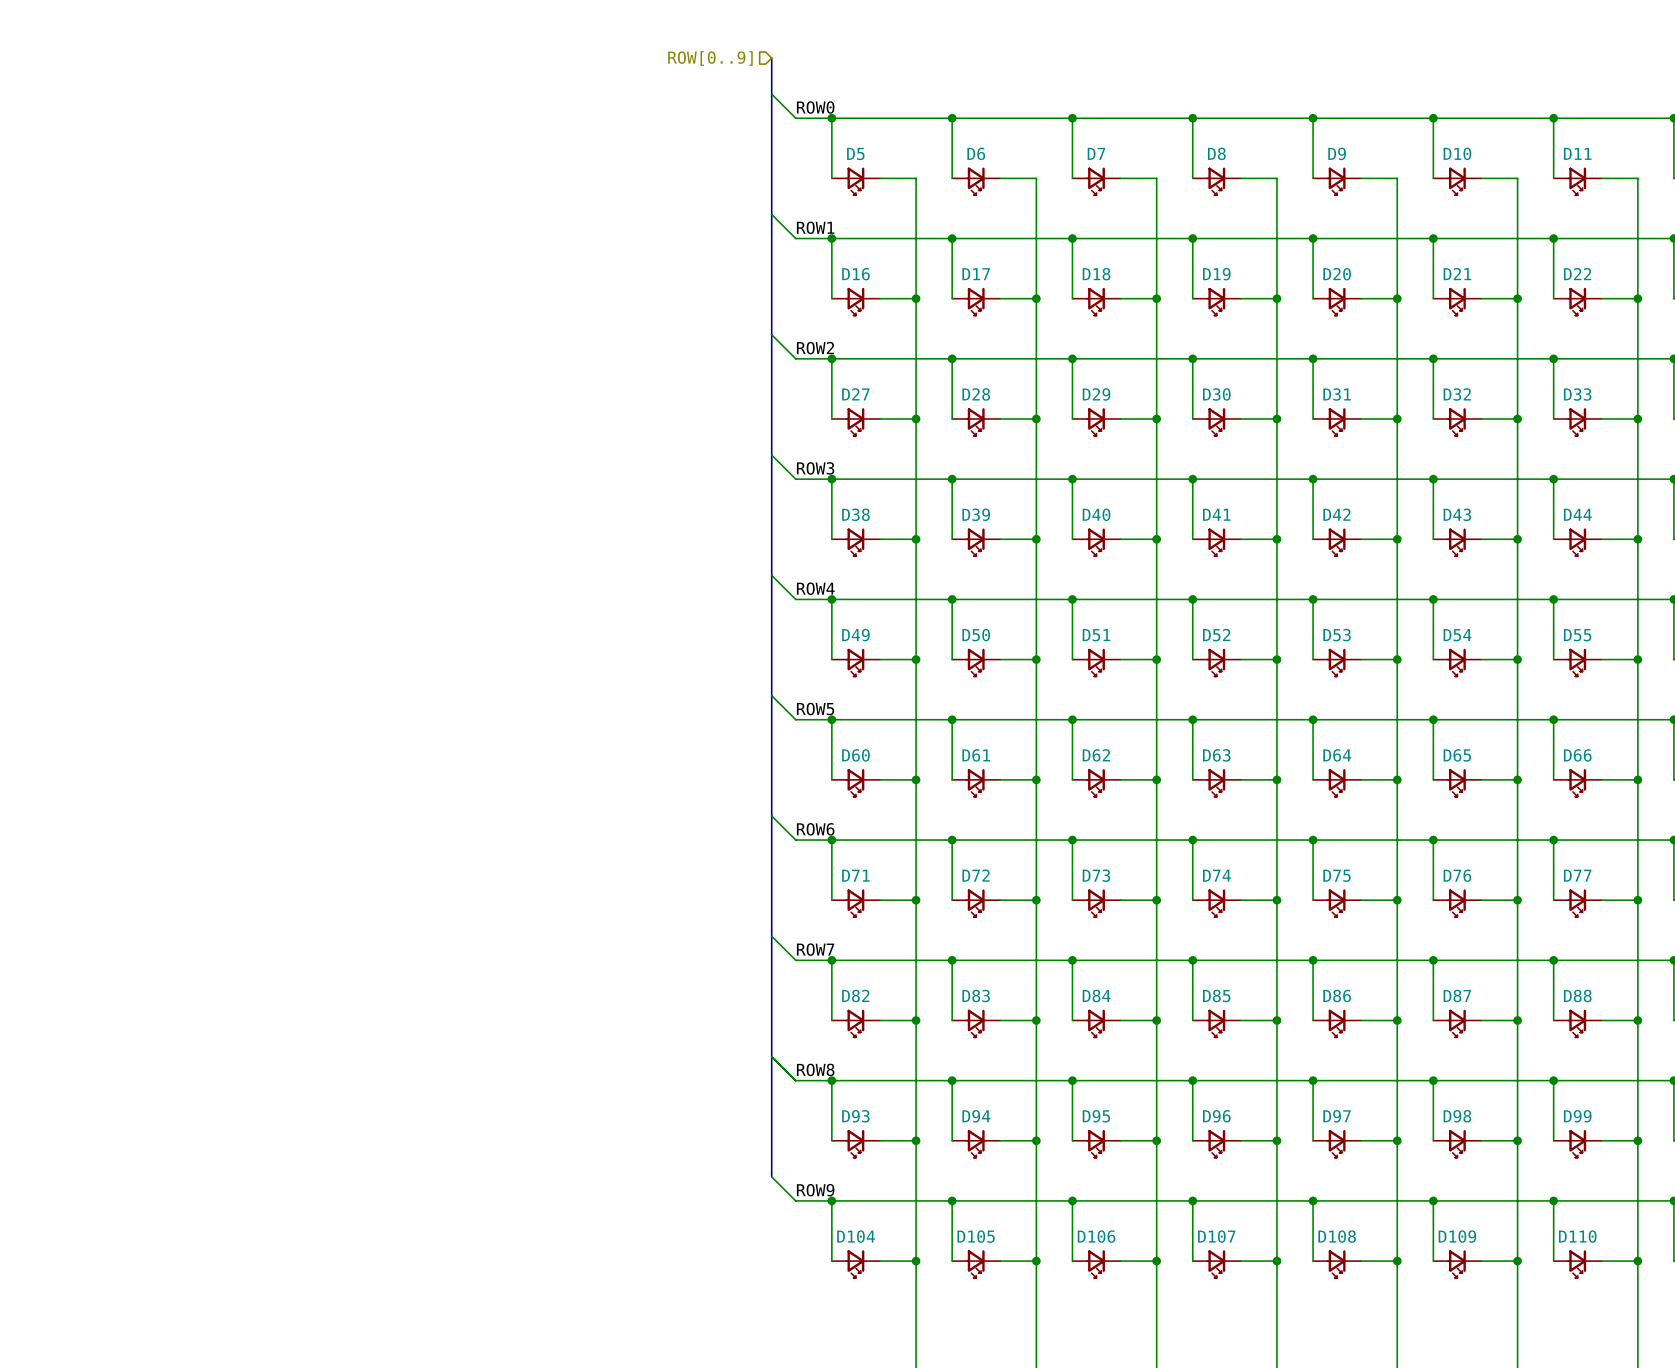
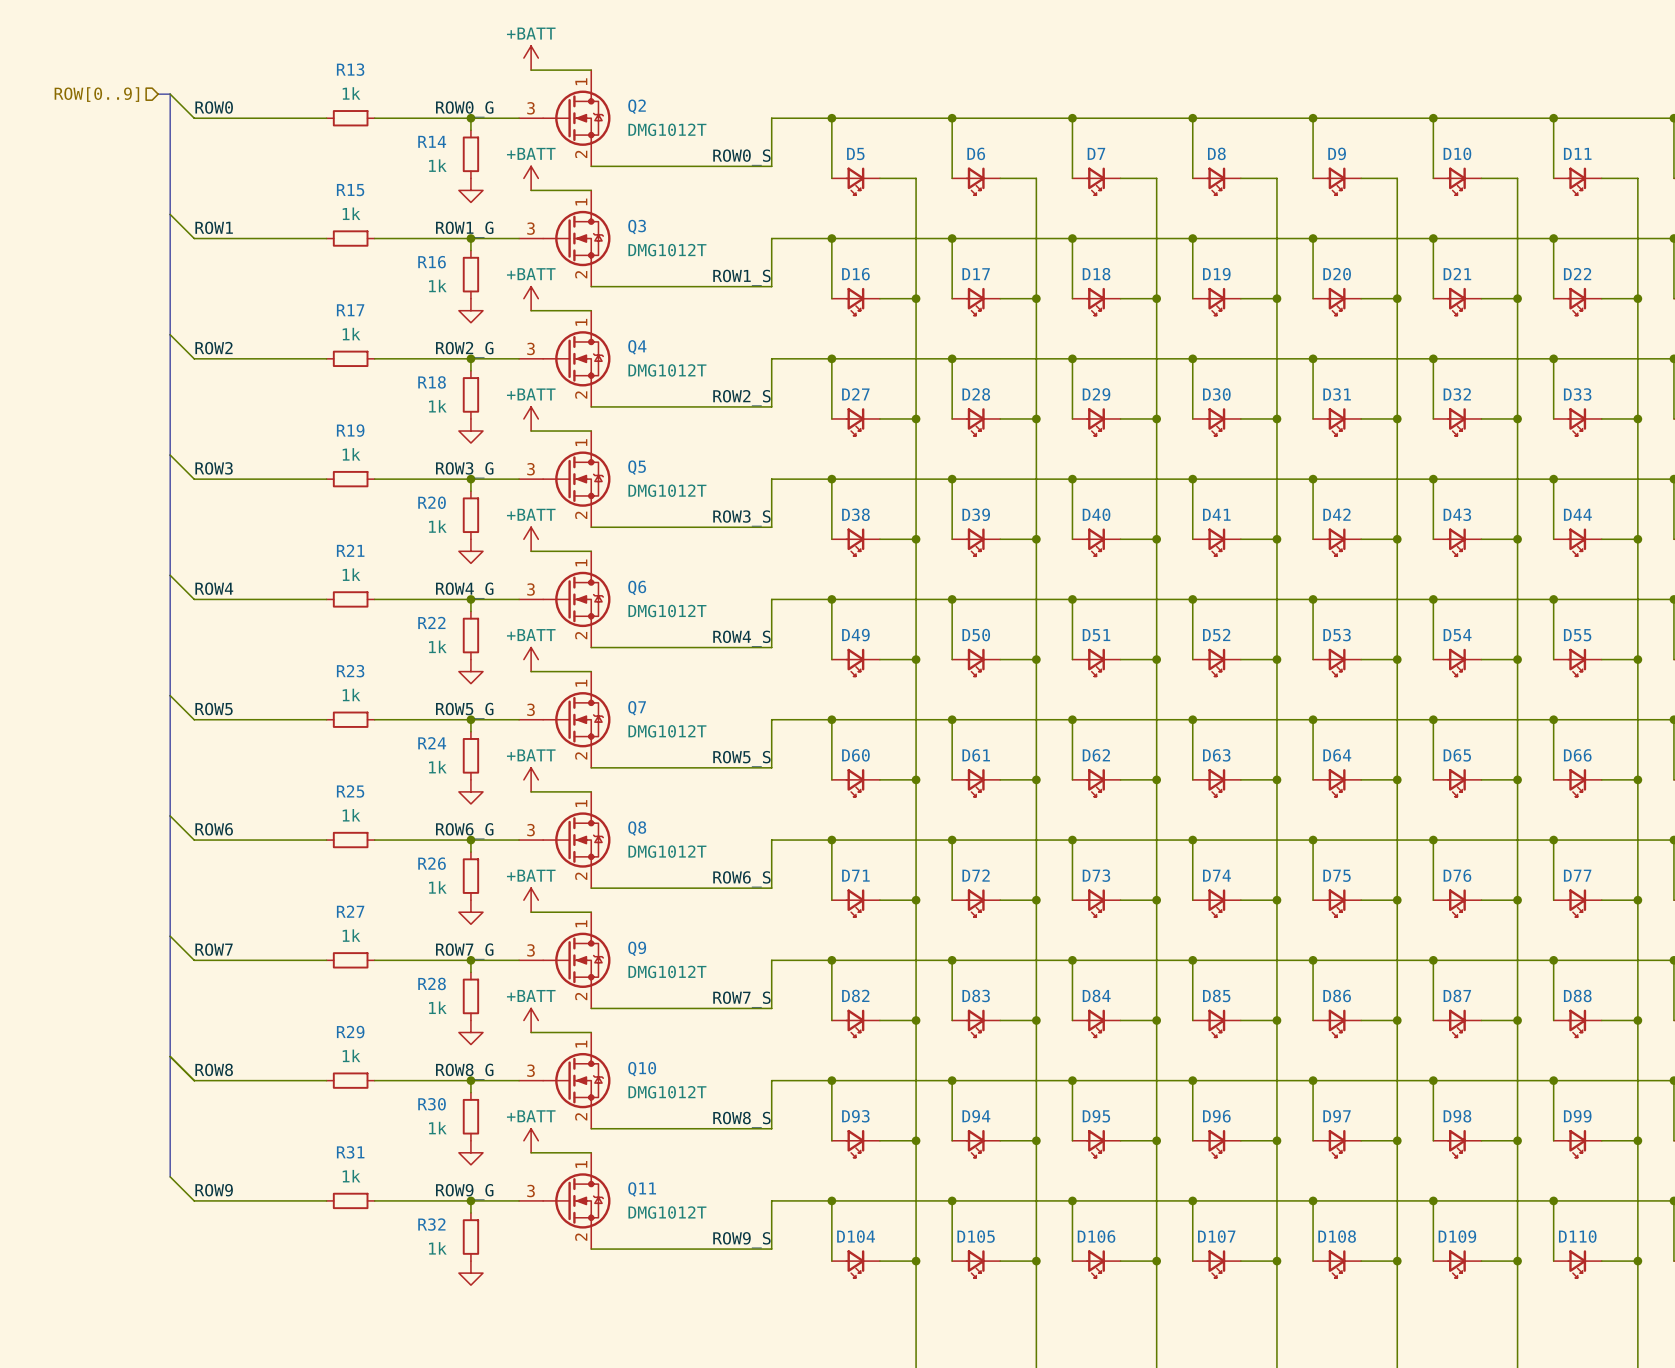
power symbol: none -> +BATT (531, 58)
hierarchical label: ROW[0..9] (710, 58) -> none
bus: (771, 58) (771, 1176) -> none
wire: none -> (531, 70) (591, 70)
hierarchical label: none -> ROW[0..9] (96, 94)
bus: none -> (158, 94) (170, 94) (170, 1176)
wire: none -> (170, 94) (194, 118) (326, 118)
wire: (771, 94) (795, 118) -> (591, 166) (771, 166) (771, 118) (795, 118)
label: none -> ROW0 (214, 107)
label: ROW0 (815, 107) -> none
label: none -> ROW0_G (464, 109)
R13: none -> 1k (350, 118)
wire: none -> (374, 118) (519, 118)
wire: none -> (470, 118) (470, 130)
junction: none -> (470, 118)
Q2: none -> DMG1012T (564, 118)
R14: none -> 1k (470, 154)
label: none -> ROW0_S (741, 157)
power symbol: none -> +BATT (531, 178)
power symbol: none -> (470, 190)
wire: none -> (531, 190) (591, 190)
wire: none -> (170, 214) (194, 238) (326, 238)
wire: (771, 214) (795, 238) -> (591, 286) (771, 286) (771, 238) (795, 238)
label: none -> ROW1 (214, 227)
label: ROW1 (815, 227) -> none
label: none -> ROW1_G (464, 229)
R15: none -> 1k (350, 238)
wire: none -> (374, 238) (519, 238)
wire: none -> (470, 238) (470, 250)
junction: none -> (470, 238)
Q3: none -> DMG1012T (564, 238)
R16: none -> 1k (470, 274)
label: none -> ROW1_S (741, 277)
power symbol: none -> +BATT (531, 298)
power symbol: none -> (470, 310)
wire: none -> (531, 310) (591, 310)
wire: none -> (170, 334) (194, 358) (326, 358)
wire: (771, 334) (795, 358) -> (591, 406) (771, 406) (771, 358) (795, 358)
label: none -> ROW2 (214, 348)
label: ROW2 (815, 348) -> none
label: none -> ROW2_G (464, 349)
R17: none -> 1k (350, 358)
wire: none -> (374, 358) (519, 358)
wire: none -> (470, 358) (470, 370)
junction: none -> (470, 358)
Q4: none -> DMG1012T (564, 358)
R18: none -> 1k (470, 394)
label: none -> ROW2_S (741, 398)
power symbol: none -> +BATT (531, 418)
power symbol: none -> (470, 431)
wire: none -> (531, 431) (591, 431)
wire: none -> (170, 455) (194, 479) (326, 479)
wire: (771, 455) (795, 479) -> (591, 527) (771, 527) (771, 479) (795, 479)
label: none -> ROW3 (214, 468)
label: ROW3 (815, 468) -> none
label: none -> ROW3_G (464, 470)
R19: none -> 1k (350, 479)
wire: none -> (374, 479) (519, 479)
wire: none -> (470, 479) (470, 491)
junction: none -> (470, 479)
Q5: none -> DMG1012T (564, 479)
R20: none -> 1k (470, 515)
label: none -> ROW3_S (741, 518)
power symbol: none -> +BATT (531, 539)
power symbol: none -> (470, 551)
wire: none -> (531, 551) (591, 551)
wire: none -> (170, 575) (194, 599) (326, 599)
wire: (771, 575) (795, 599) -> (591, 647) (771, 647) (771, 599) (795, 599)
label: none -> ROW4 (214, 588)
label: ROW4 (815, 588) -> none
label: none -> ROW4_G (464, 590)
R21: none -> 1k (350, 599)
wire: none -> (374, 599) (519, 599)
wire: none -> (470, 599) (470, 611)
junction: none -> (470, 599)
Q6: none -> DMG1012T (564, 599)
R22: none -> 1k (470, 635)
label: none -> ROW4_S (741, 638)
power symbol: none -> +BATT (531, 659)
power symbol: none -> (470, 671)
wire: none -> (531, 671) (591, 671)
wire: none -> (170, 695) (194, 719) (326, 719)
wire: (771, 695) (795, 719) -> (591, 767) (771, 767) (771, 719) (795, 719)
label: none -> ROW5 (214, 709)
label: ROW5 (815, 709) -> none
label: none -> ROW5_G (464, 710)
R23: none -> 1k (350, 719)
wire: none -> (374, 719) (519, 719)
wire: none -> (470, 719) (470, 731)
junction: none -> (470, 719)
Q7: none -> DMG1012T (564, 719)
R24: none -> 1k (470, 755)
label: none -> ROW5_S (741, 758)
power symbol: none -> +BATT (531, 779)
power symbol: none -> (470, 791)
wire: none -> (531, 791) (591, 791)
wire: none -> (170, 815) (194, 840) (326, 840)
wire: (771, 815) (795, 840) -> (591, 888) (771, 888) (771, 840) (795, 840)
label: none -> ROW6 (214, 829)
label: ROW6 (815, 829) -> none
label: none -> ROW6_G (464, 831)
R25: none -> 1k (350, 840)
wire: none -> (374, 840) (519, 840)
wire: none -> (470, 840) (470, 852)
junction: none -> (470, 840)
Q8: none -> DMG1012T (564, 840)
R26: none -> 1k (470, 876)
label: none -> ROW6_S (741, 879)
power symbol: none -> +BATT (531, 900)
power symbol: none -> (470, 912)
wire: none -> (531, 912) (591, 912)
wire: none -> (170, 936) (194, 960) (326, 960)
wire: (771, 936) (795, 960) -> (591, 1008) (771, 1008) (771, 960) (795, 960)
label: none -> ROW7 (214, 949)
label: ROW7 (815, 949) -> none
label: none -> ROW7_G (464, 951)
R27: none -> 1k (350, 960)
wire: none -> (374, 960) (519, 960)
wire: none -> (470, 960) (470, 972)
junction: none -> (470, 960)
Q9: none -> DMG1012T (564, 960)
R28: none -> 1k (470, 996)
label: none -> ROW7_S (741, 999)
power symbol: none -> +BATT (531, 1020)
power symbol: none -> (470, 1032)
wire: none -> (531, 1032) (591, 1032)
wire: none -> (170, 1056) (194, 1080) (326, 1080)
wire: (771, 1056) (795, 1080) -> (591, 1128) (771, 1128) (771, 1080) (795, 1080)
label: none -> ROW8 (214, 1069)
label: ROW8 (815, 1069) -> none
label: none -> ROW8_G (464, 1071)
R29: none -> 1k (350, 1080)
wire: none -> (374, 1080) (519, 1080)
wire: none -> (470, 1080) (470, 1092)
junction: none -> (470, 1080)
Q10: none -> DMG1012T (564, 1080)
R30: none -> 1k (470, 1116)
label: none -> ROW8_S (741, 1119)
power symbol: none -> +BATT (531, 1140)
power symbol: none -> (470, 1152)
wire: none -> (531, 1152) (591, 1152)
wire: none -> (170, 1176) (194, 1200) (326, 1200)
wire: (771, 1176) (795, 1200) -> (591, 1249) (771, 1249) (771, 1200) (795, 1200)
label: none -> ROW9 (214, 1190)
label: ROW9 (815, 1190) -> none
label: none -> ROW9_G (464, 1192)
R31: none -> 1k (350, 1200)
wire: none -> (374, 1200) (519, 1200)
wire: none -> (470, 1200) (470, 1212)
junction: none -> (470, 1200)
Q11: none -> DMG1012T (564, 1200)
R32: none -> 1k (470, 1237)
label: none -> ROW9_S (741, 1240)
power symbol: none -> (470, 1273)

